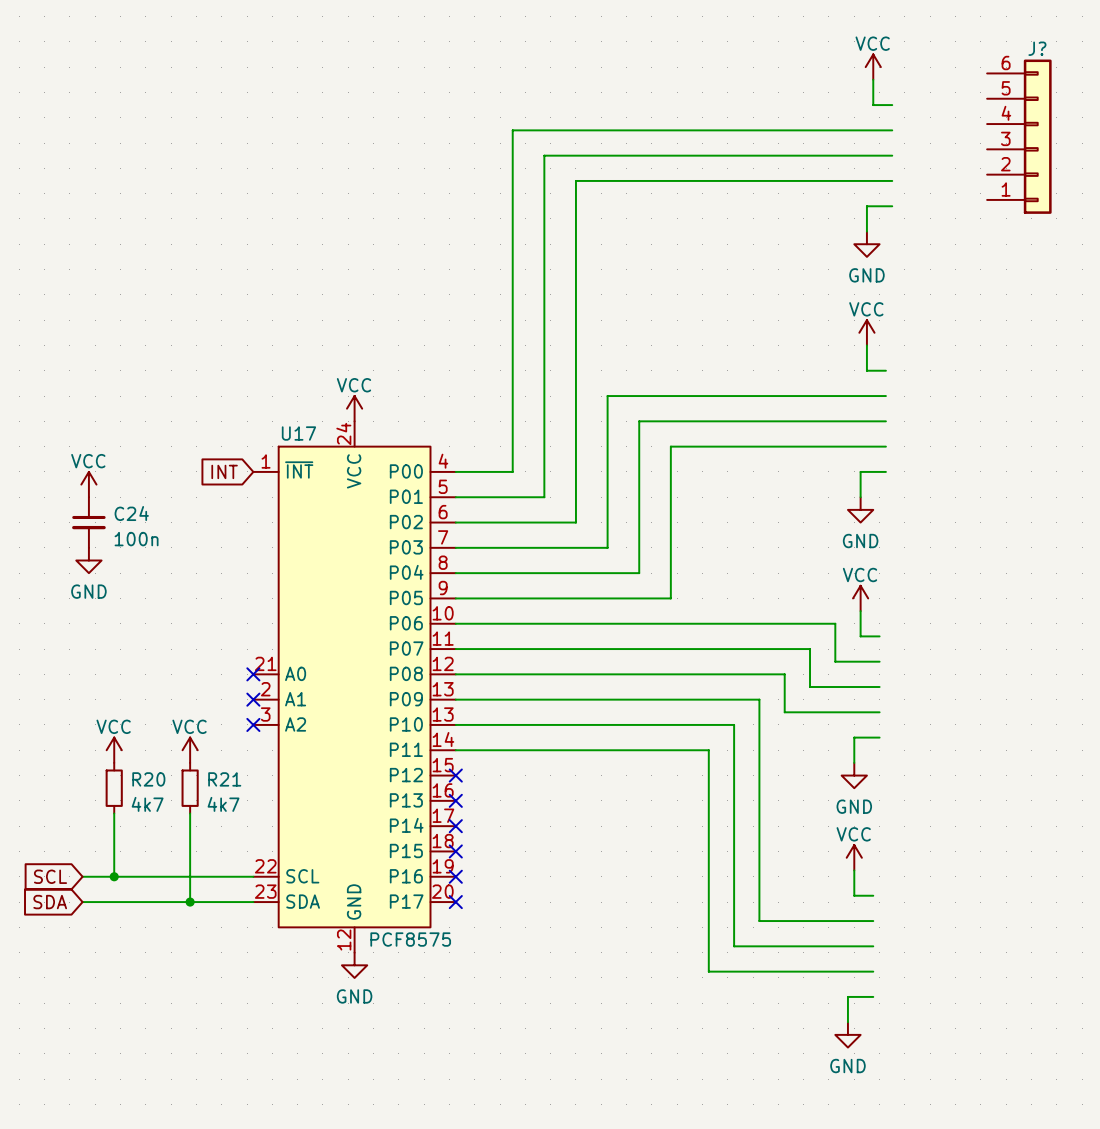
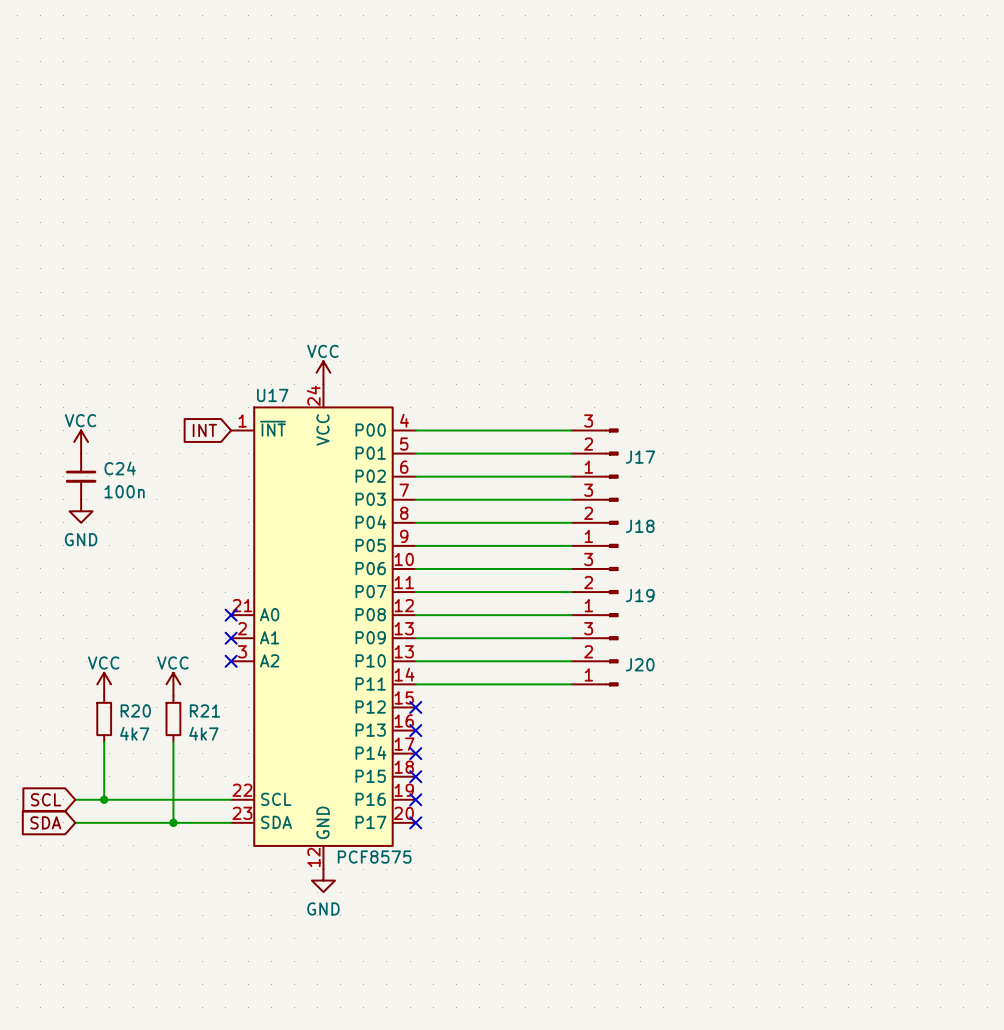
power symbol: VCC (873, 67) -> none
wire: (873, 79) (873, 105) (892, 105) -> none
wire: (892, 130) (512, 130) (512, 471) -> (571, 430) (467, 430)
J?: (1019, 136) -> none
wire: (892, 155) (544, 155) (544, 497) -> (571, 453) (496, 453)
wire: (892, 180) (575, 180) (575, 522) -> (571, 476) (525, 476)
wire: (892, 206) (866, 206) (866, 231) -> none
power symbol: GND (866, 244) -> none
power symbol: VCC (866, 332) -> none
wire: (866, 345) (866, 370) (885, 370) -> none
wire: (885, 396) (607, 396) (607, 547) -> (571, 499) (554, 499)
wire: (885, 421) (639, 421) (639, 573) (626, 573) -> none
wire: (885, 446) (670, 446) (670, 598) (626, 598) -> none
wire: (885, 471) (860, 471) (860, 497) -> none
J17: none -> (594, 453)
power symbol: GND (860, 509) -> none
J18: none -> (594, 522)
power symbol: VCC (860, 598) -> none
wire: (860, 611) (860, 636) (879, 636) -> none
wire: (626, 623) (835, 623) (835, 661) (879, 661) -> none
wire: (626, 649) (810, 649) (810, 687) (879, 687) -> none
J19: none -> (594, 592)
wire: (626, 674) (784, 674) (784, 712) (879, 712) -> none
wire: (626, 699) (759, 699) (759, 921) (873, 921) -> none
wire: (626, 724) (734, 724) (734, 946) (873, 946) -> none
J20: none -> (594, 661)
wire: (879, 737) (854, 737) (854, 762) -> none
wire: (626, 750) (708, 750) (708, 971) (873, 971) -> none
power symbol: GND (854, 775) -> none
power symbol: VCC (854, 857) -> none
wire: (854, 870) (854, 895) (873, 895) -> none
wire: (873, 996) (847, 996) (847, 1022) -> none
power symbol: GND (847, 1034) -> none

